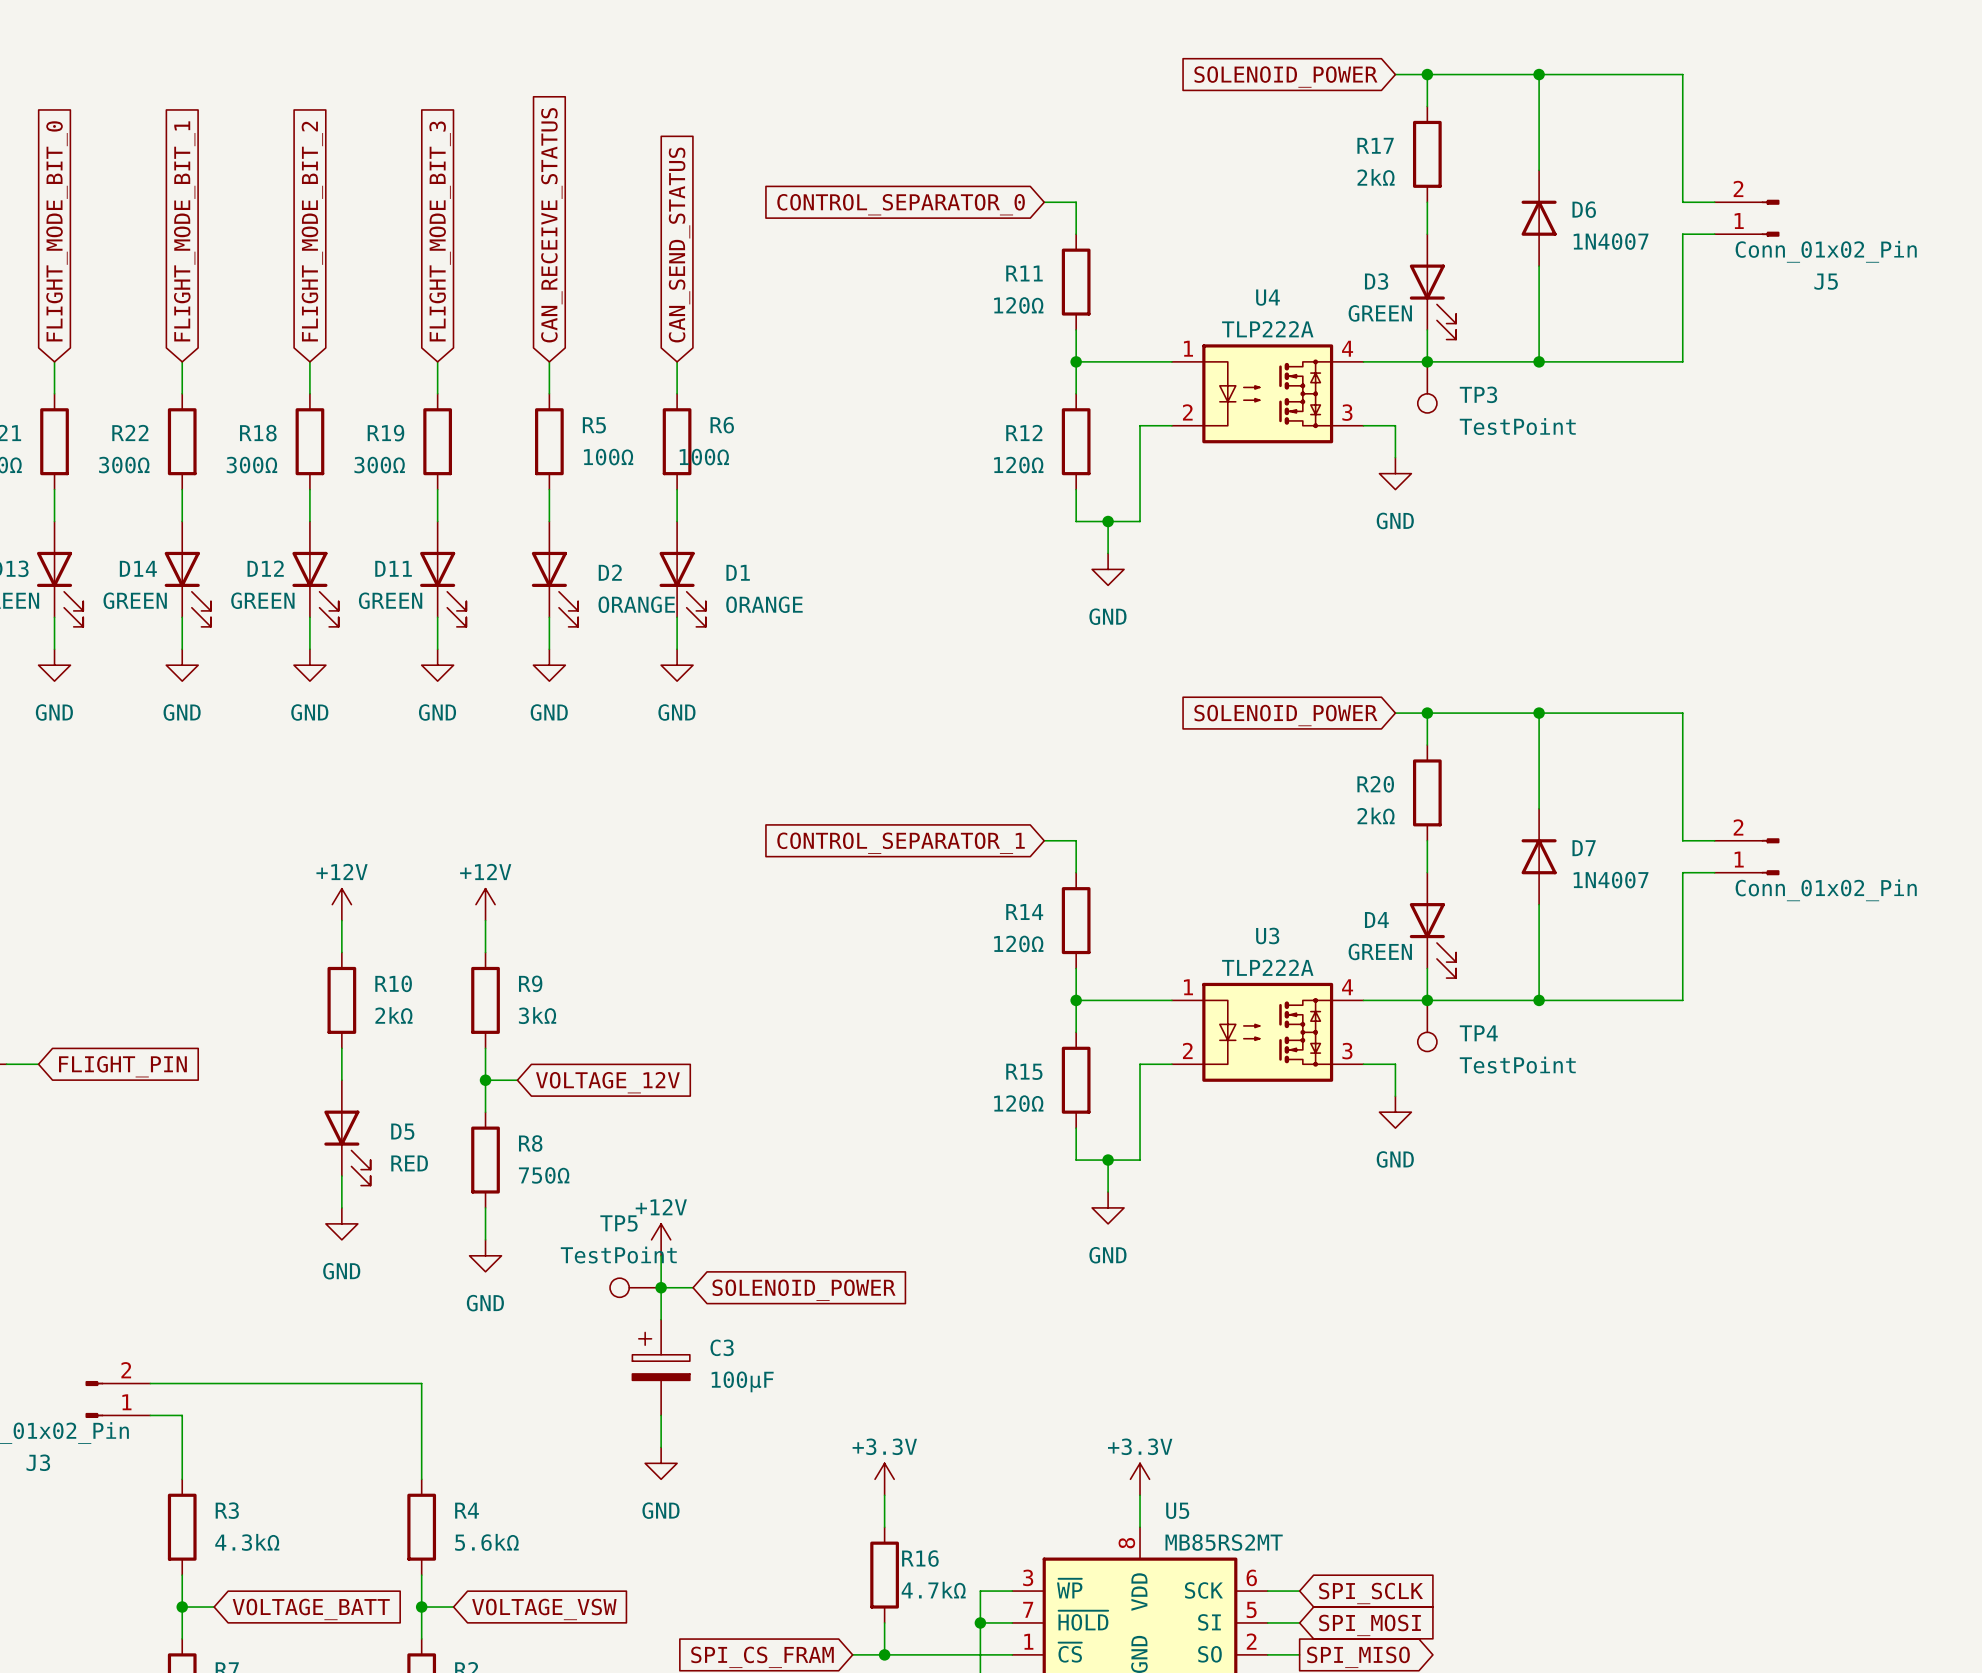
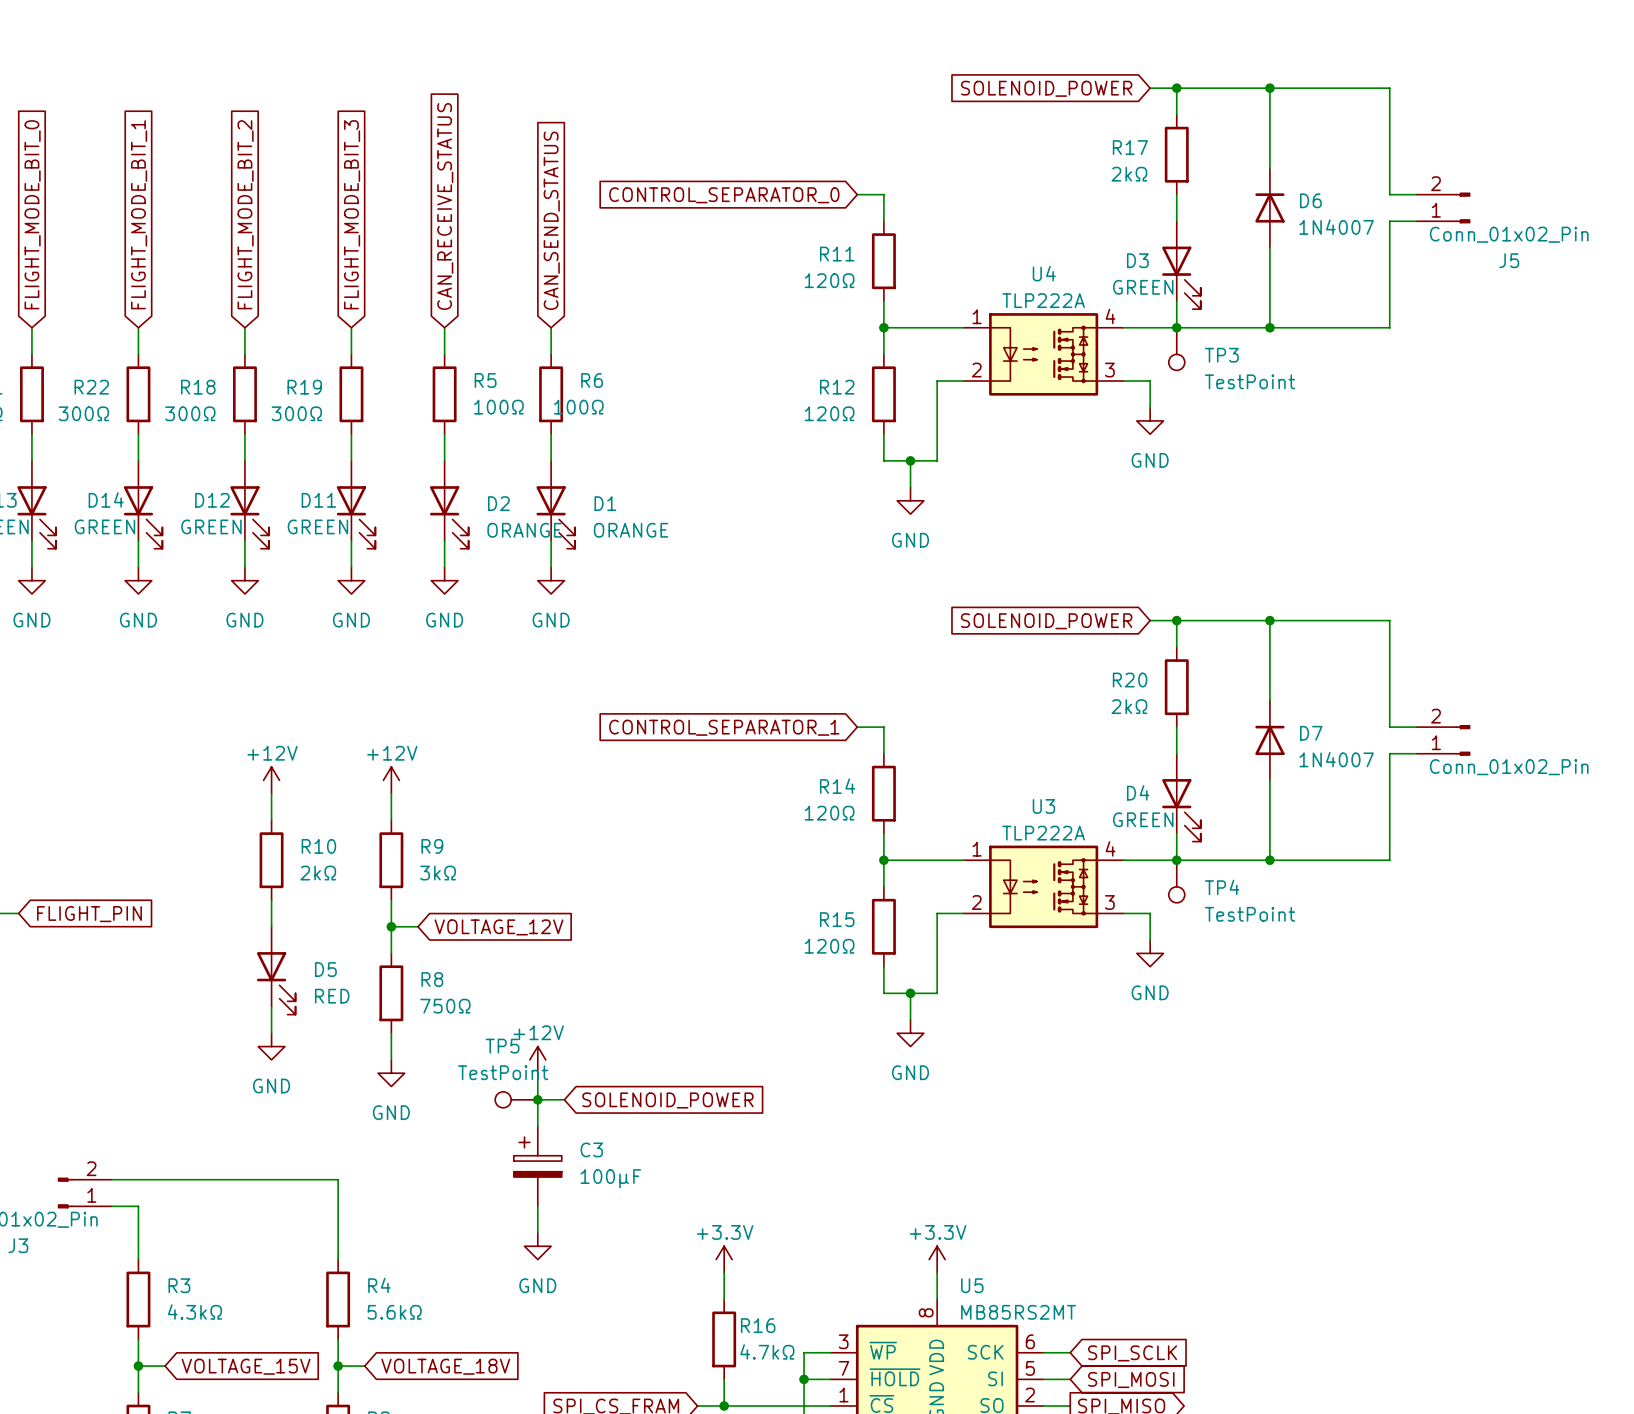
global label: VOLTAGE_BATT (311, 1609) -> VOLTAGE_15V (246, 1366)
global label: VOLTAGE_VSW (544, 1609) -> VOLTAGE_18V (445, 1366)

